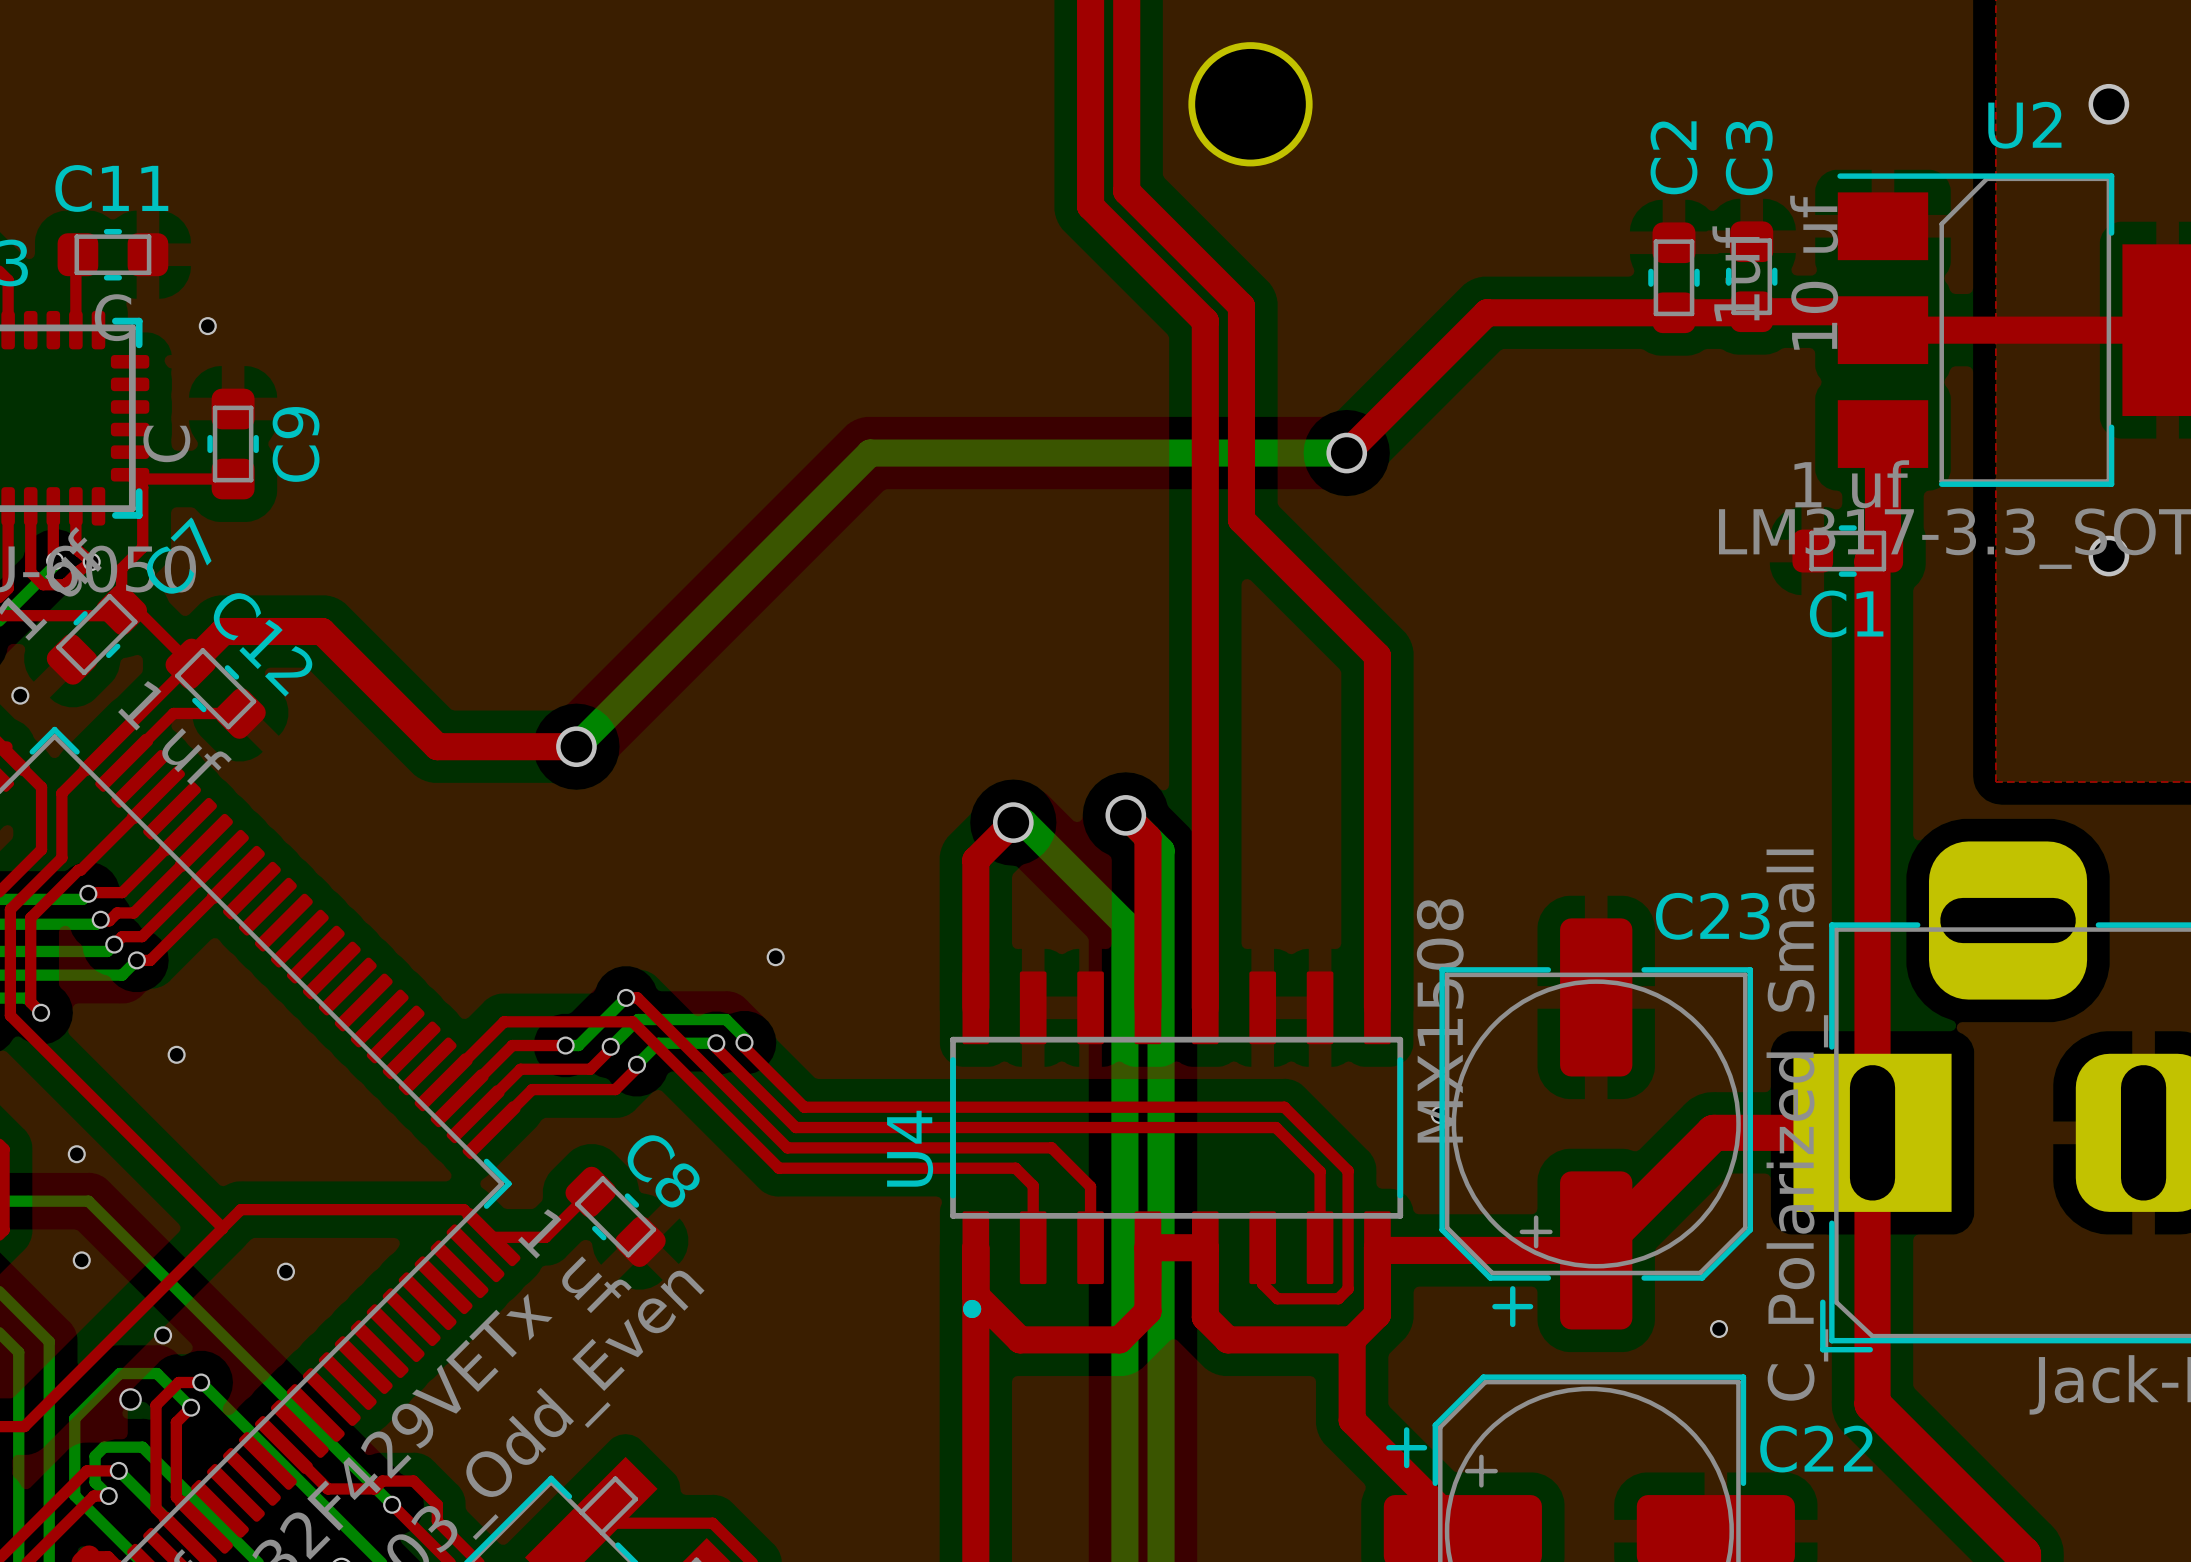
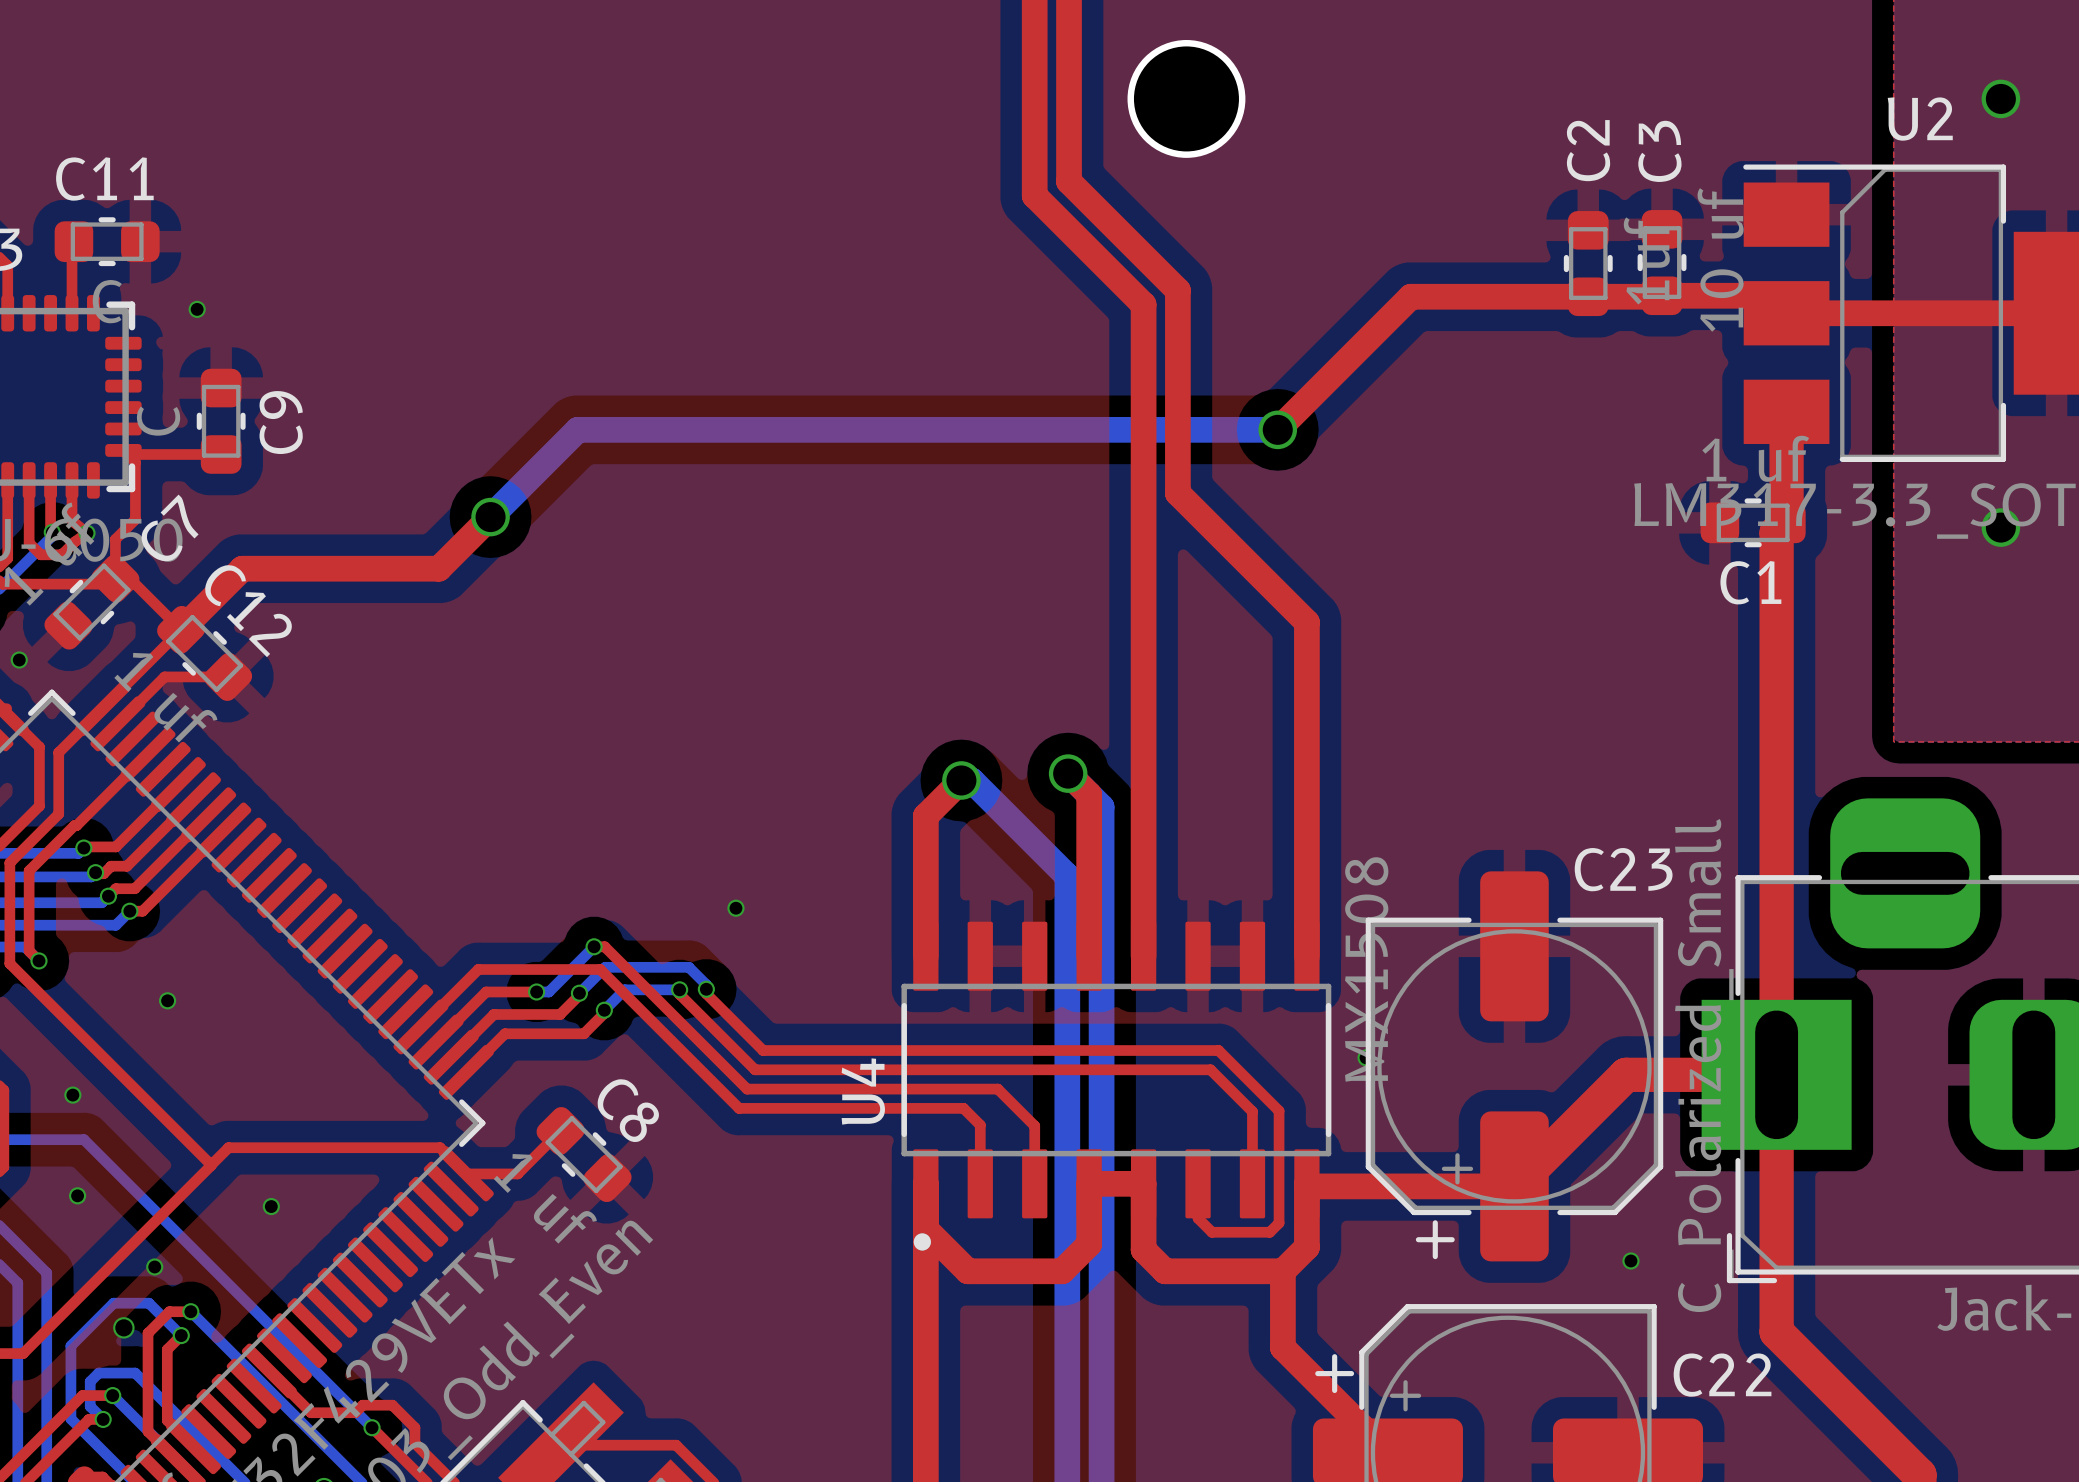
bottom track: (870, 453) (576, 746) -> (825, 429) (577, 429) (490, 517)
top track: (223, 631) (322, 631) (437, 746) (576, 746) -> (211, 599) (242, 568) (438, 568) (490, 517)
via position: (576, 746) -> (490, 517)

